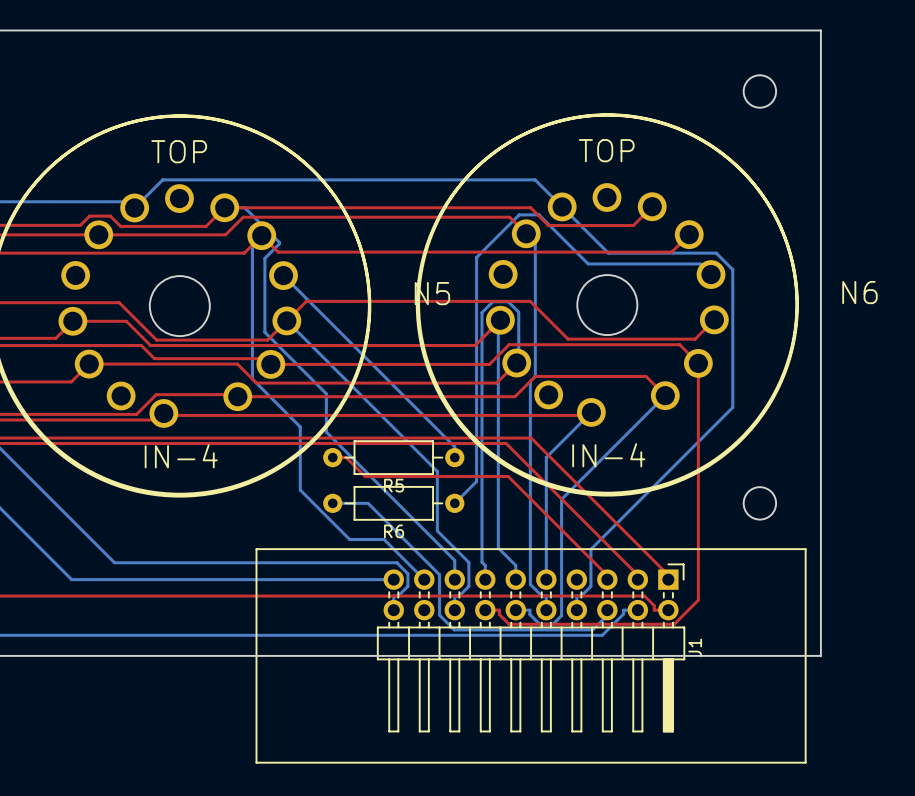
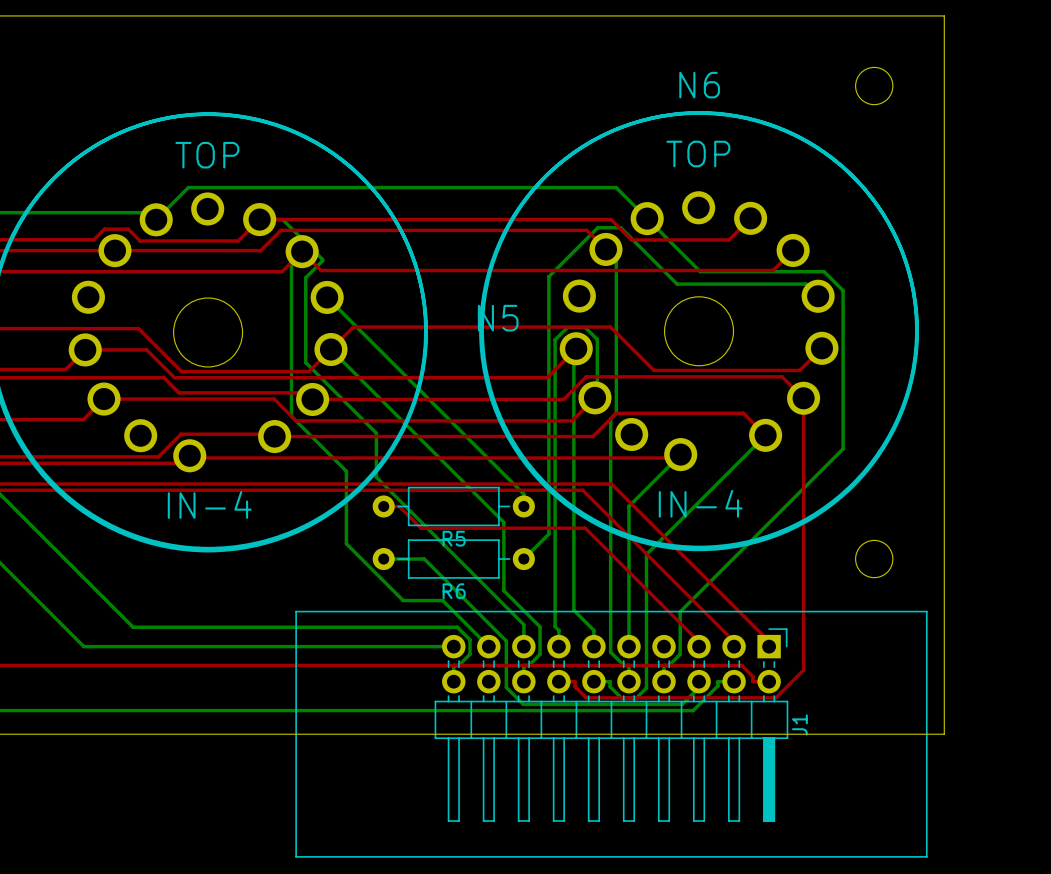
N6 name position: N6 (859, 292) -> N6 (699, 85)

